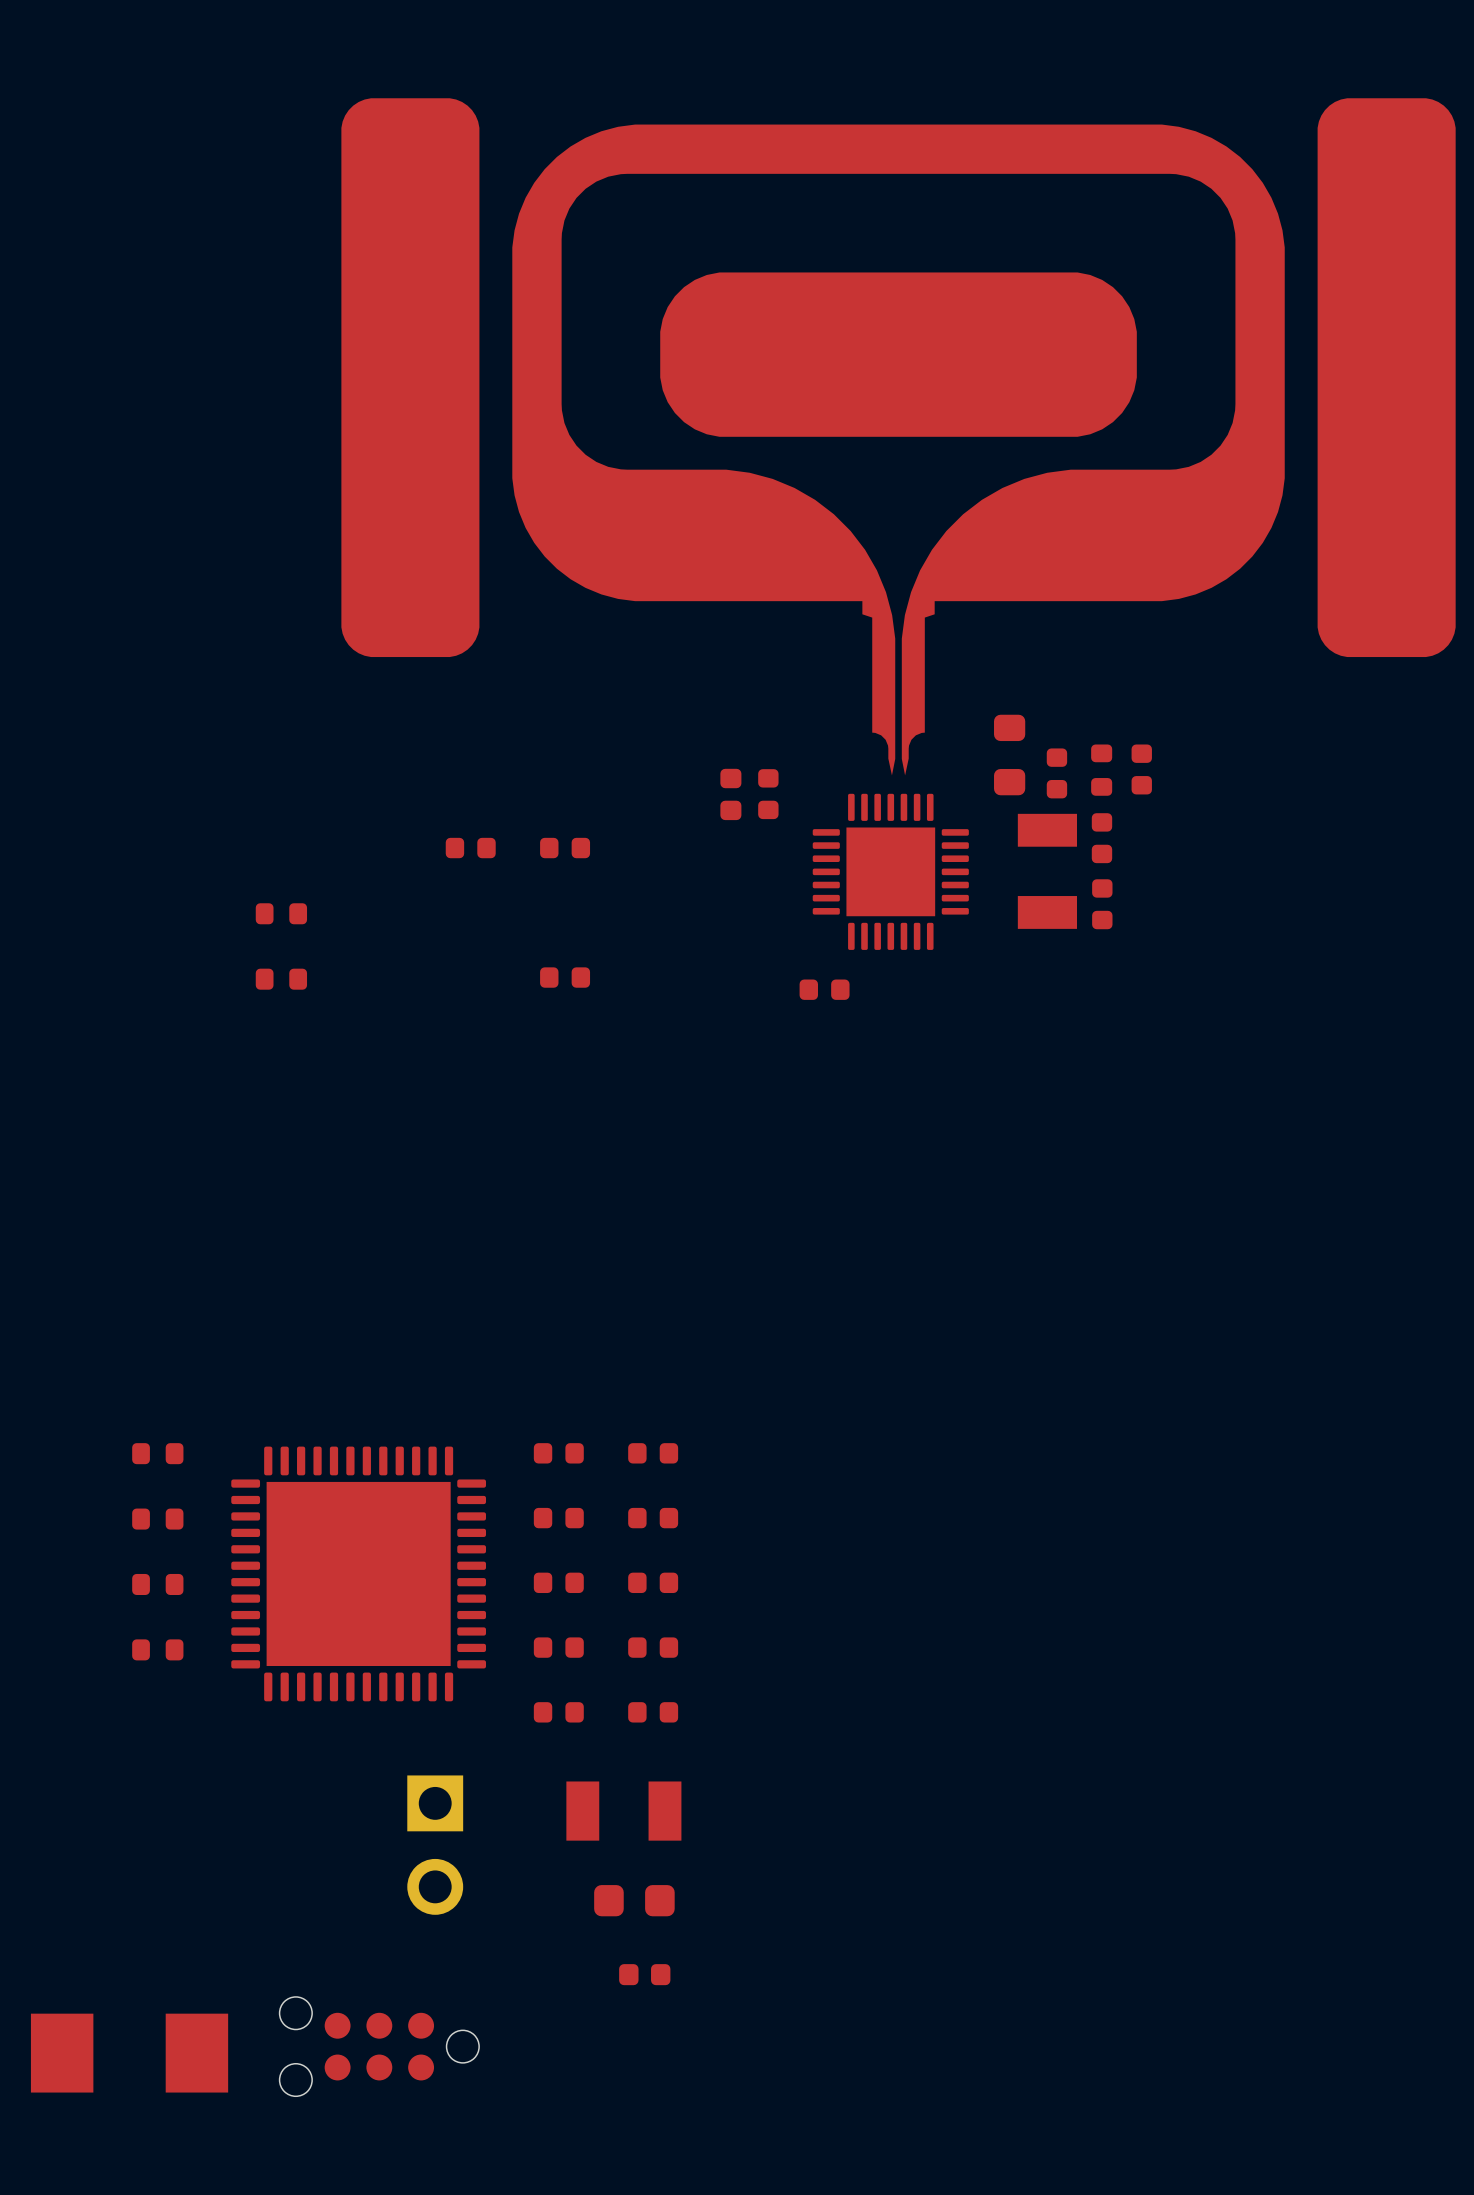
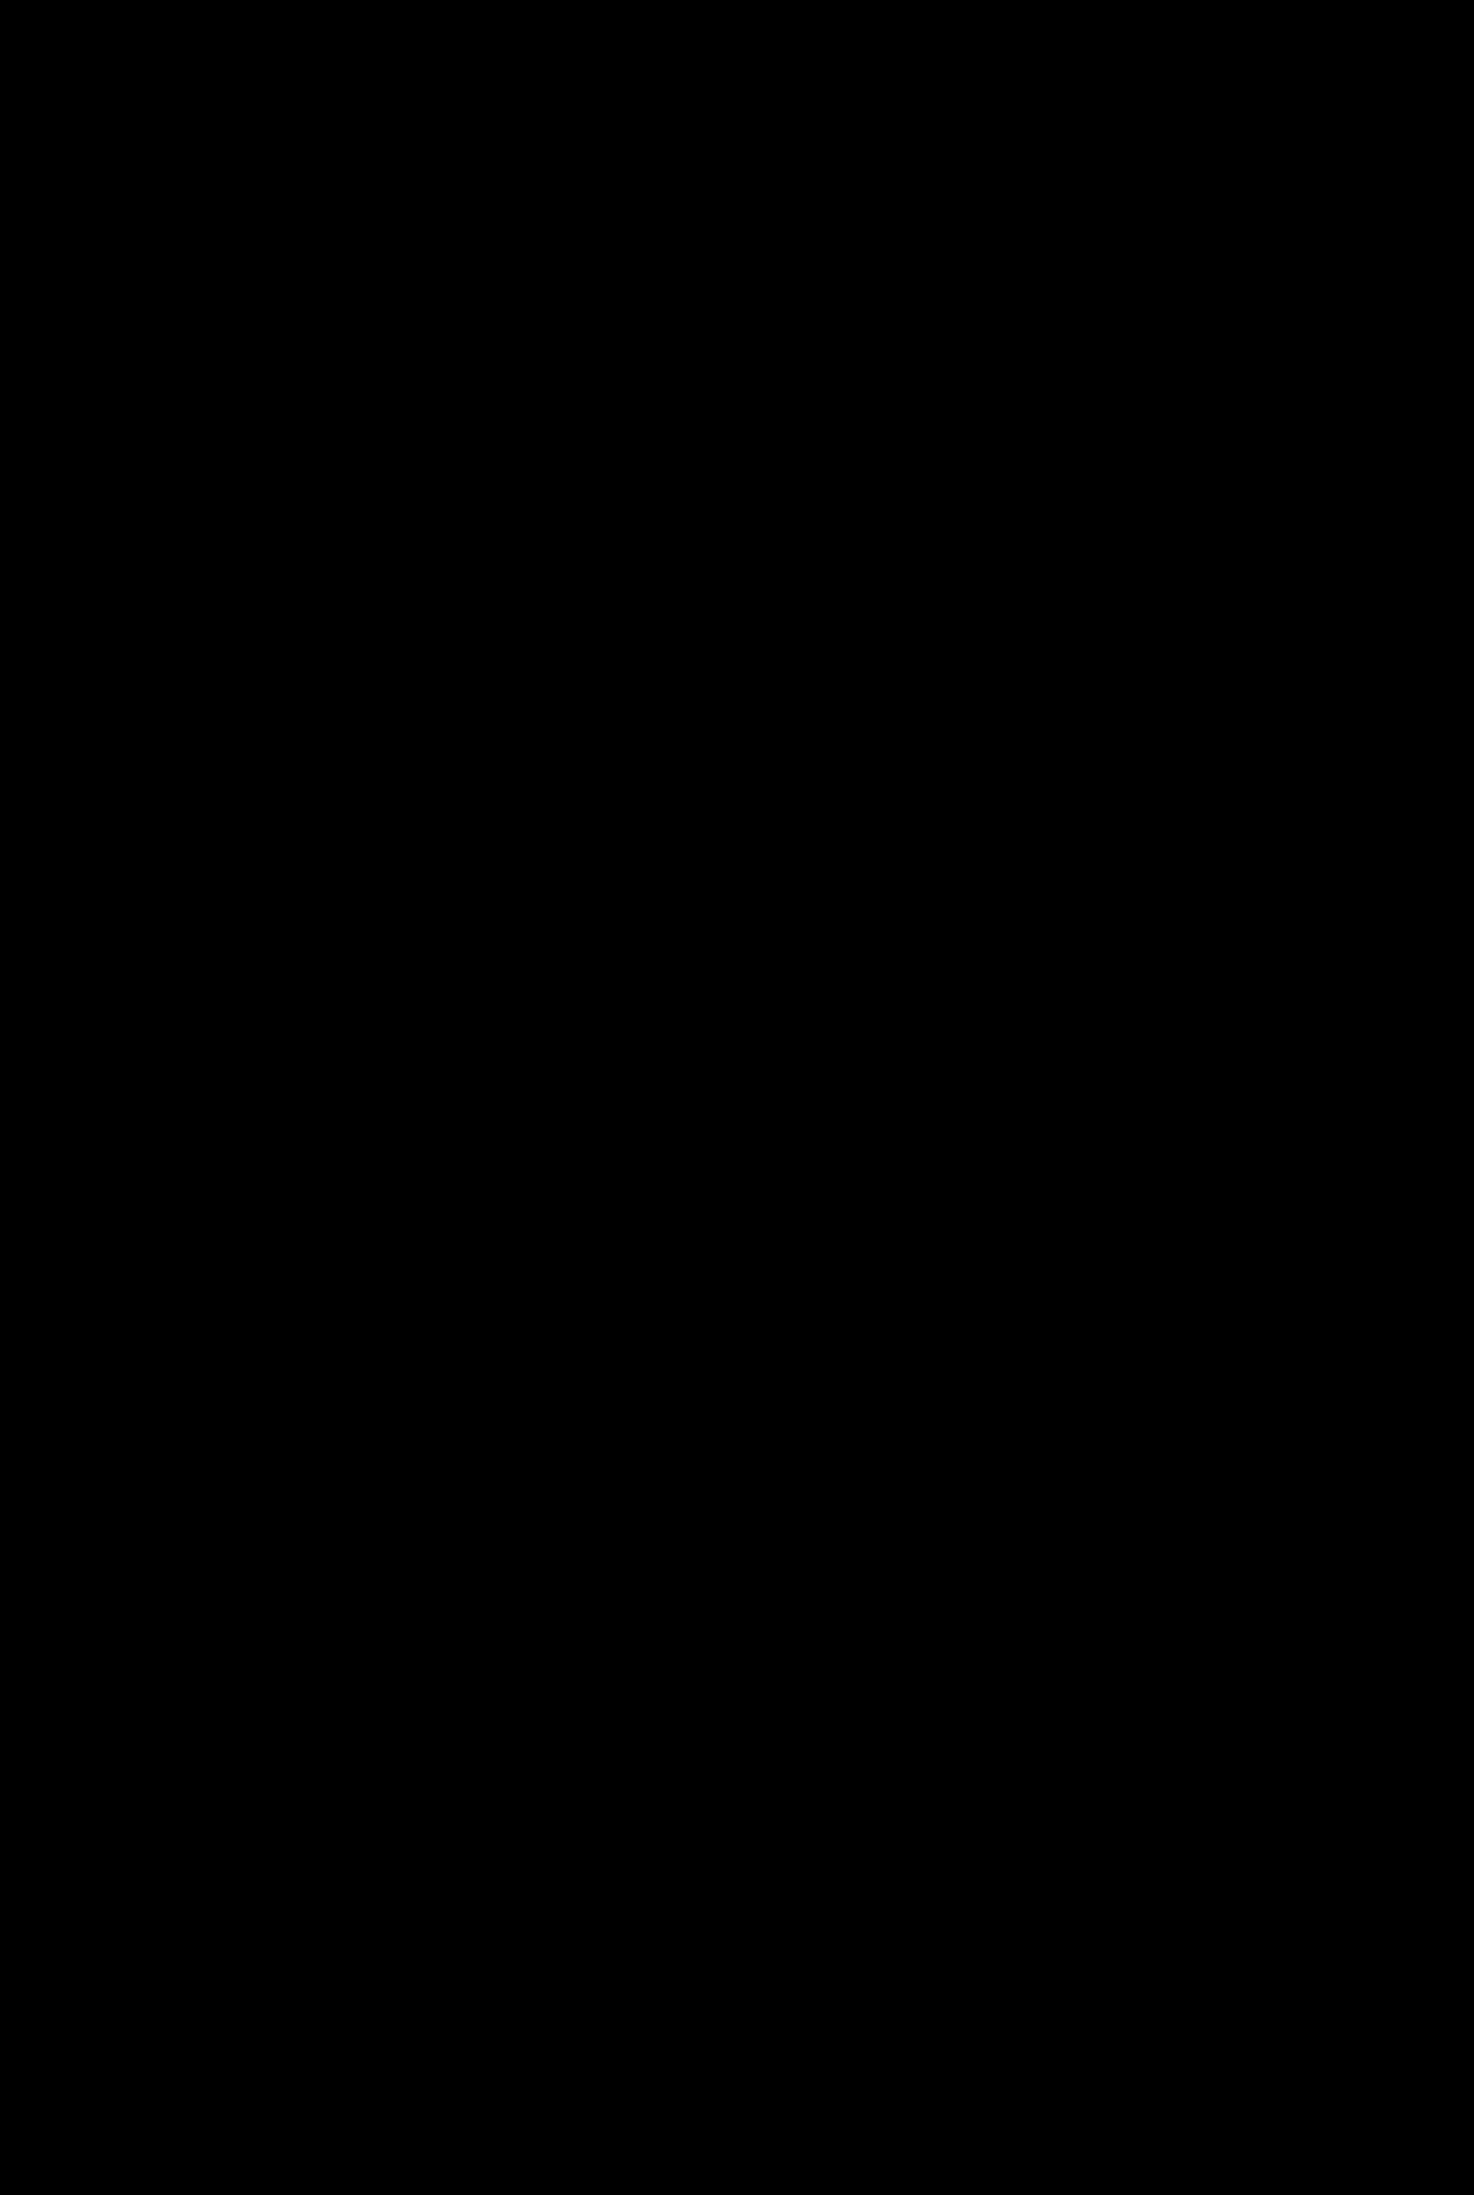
part: (898, 436) -> none
part: (1009, 755) -> none
part: (1141, 769) -> none
part: (1101, 770) -> none
part: (1056, 773) -> none
part: (730, 794) -> none
part: (768, 794) -> none
part: (1101, 838) -> none
part: (470, 848) -> none
part: (565, 848) -> none
part: (890, 871) -> none
part: (1047, 871) -> none
part: (1102, 904) -> none
part: (281, 913) -> none
part: (565, 977) -> none
part: (281, 979) -> none
part: (824, 989) -> none
part: (157, 1453) -> none
part: (558, 1453) -> none
part: (653, 1453) -> none
part: (558, 1518) -> none
part: (653, 1518) -> none
part: (157, 1519) -> none
part: (358, 1573) -> none
part: (558, 1582) -> none
part: (653, 1582) -> none
part: (157, 1584) -> none
part: (558, 1647) -> none
part: (653, 1647) -> none
part: (157, 1649) -> none
part: (558, 1712) -> none
part: (653, 1712) -> none
part: (623, 1811) -> none
part: (435, 1845) -> none
part: (634, 1900) -> none
part: (644, 1974) -> none
part: (379, 2046) -> none
part: (129, 2053) -> none

